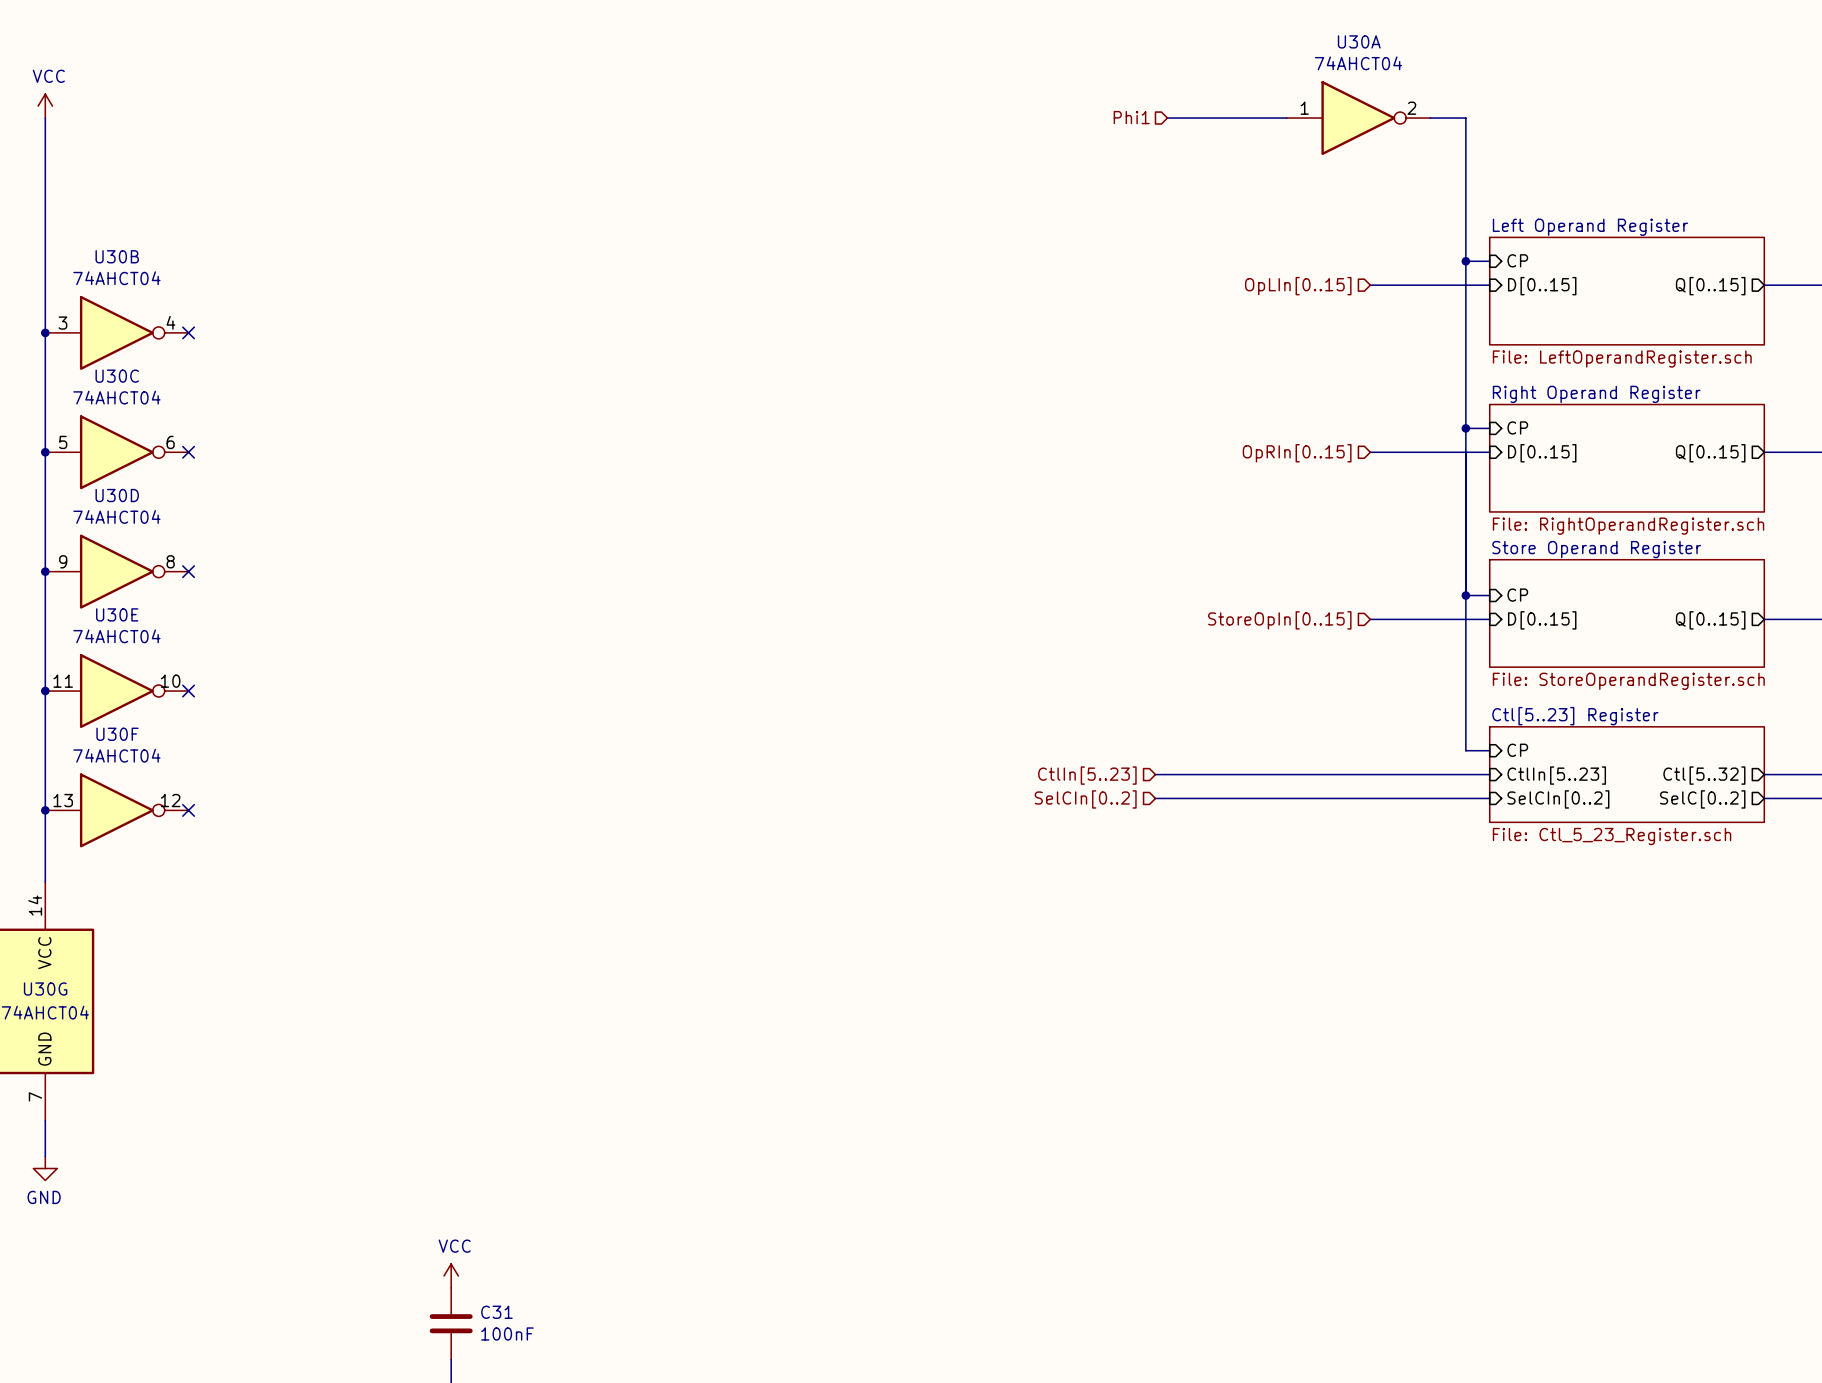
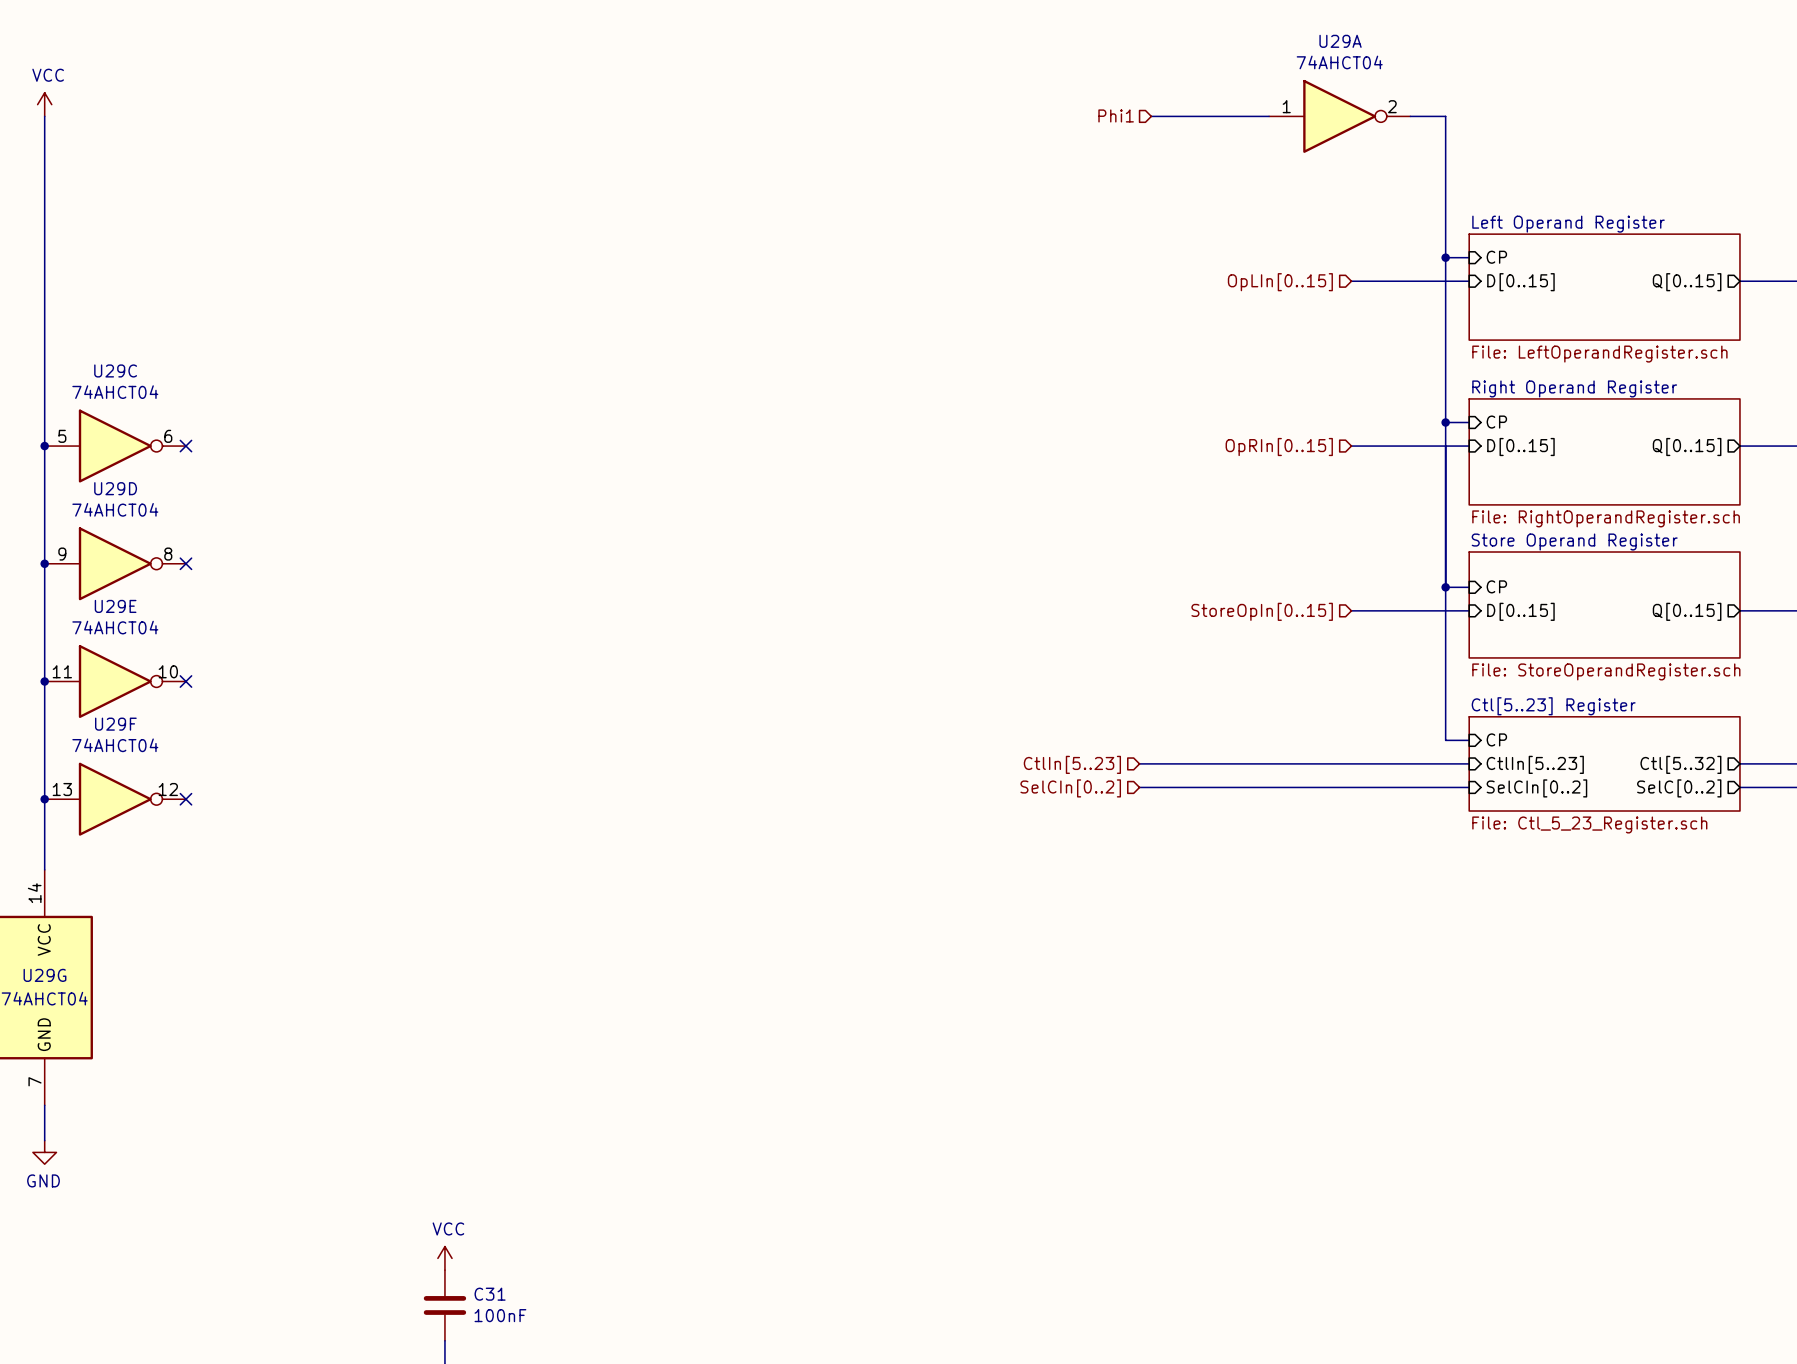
U30A name: U30A (1359, 41) -> U29A (1340, 41)
junction: (45, 332) -> none
U30B: 74AHCT04 (116, 332) -> none
no-connect mark: (188, 332) -> none
U30C name: U30C (117, 376) -> U29C (115, 370)
U30D name: U30D (117, 495) -> U29D (115, 488)
U30E name: U30E (117, 614) -> U29E (115, 606)
U30F name: U30F (117, 734) -> U29F (115, 724)
U30G name: U30G (45, 989) -> U29G (44, 975)

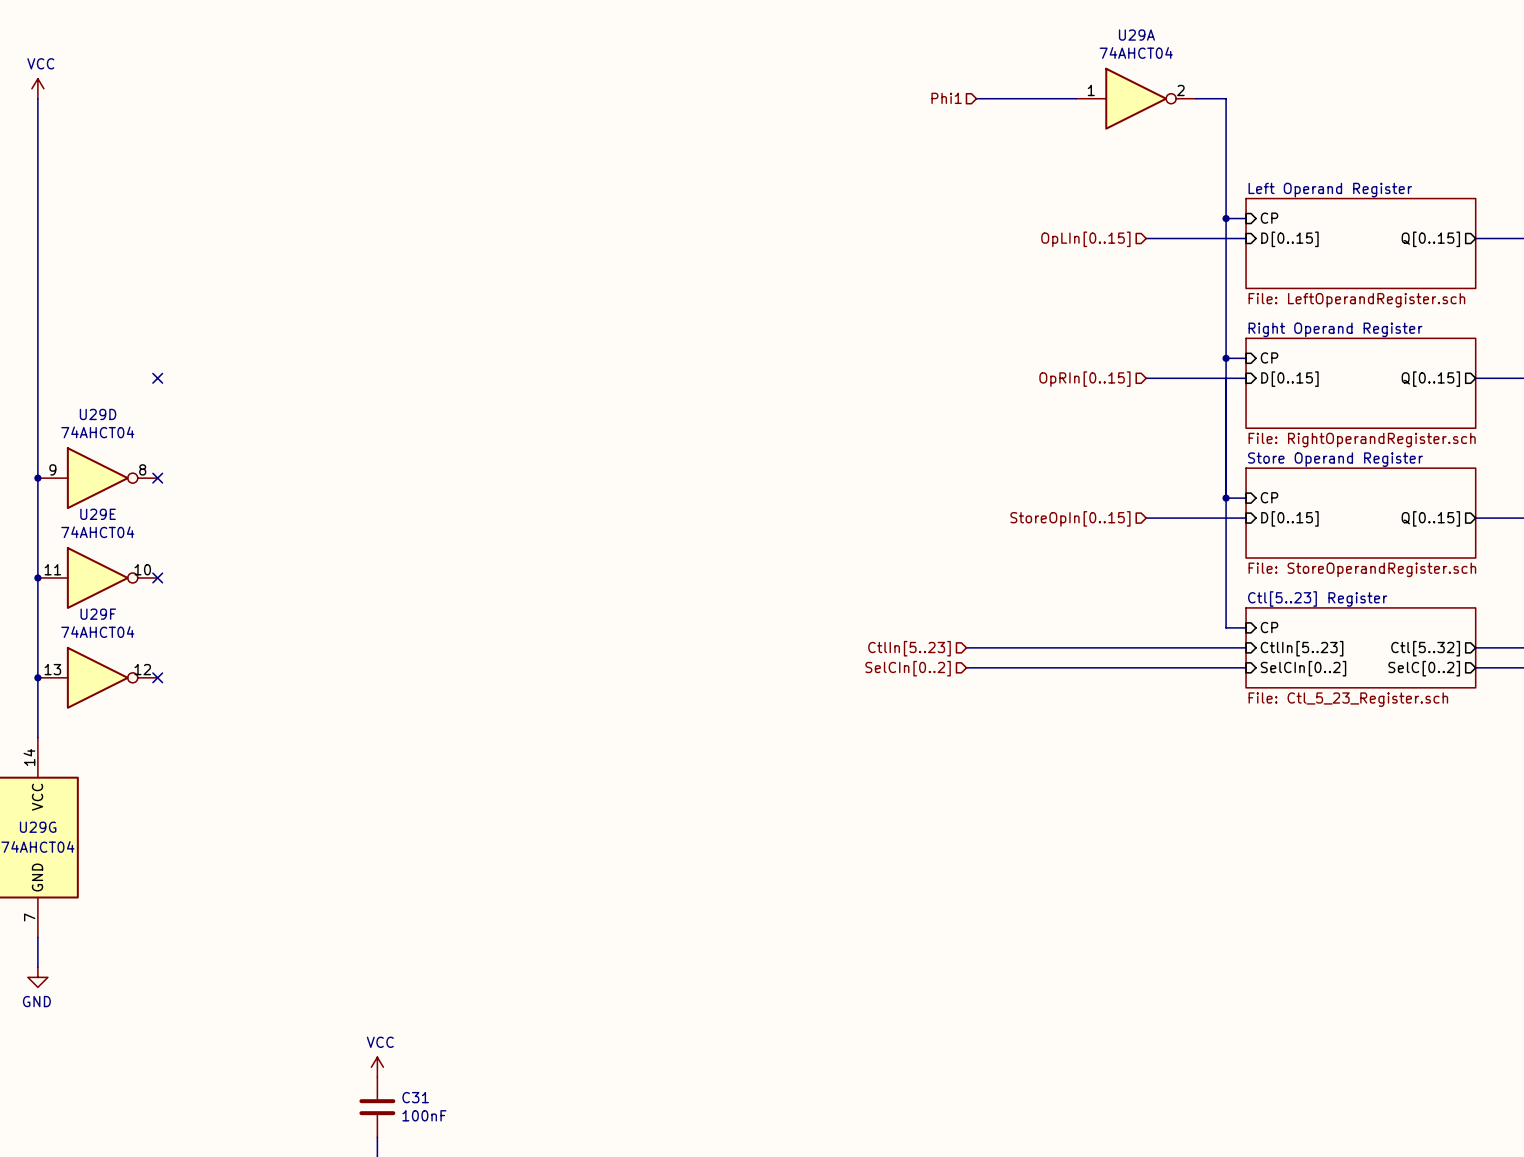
junction: (44, 446) -> none
U29C: 74AHCT04 (115, 446) -> none

